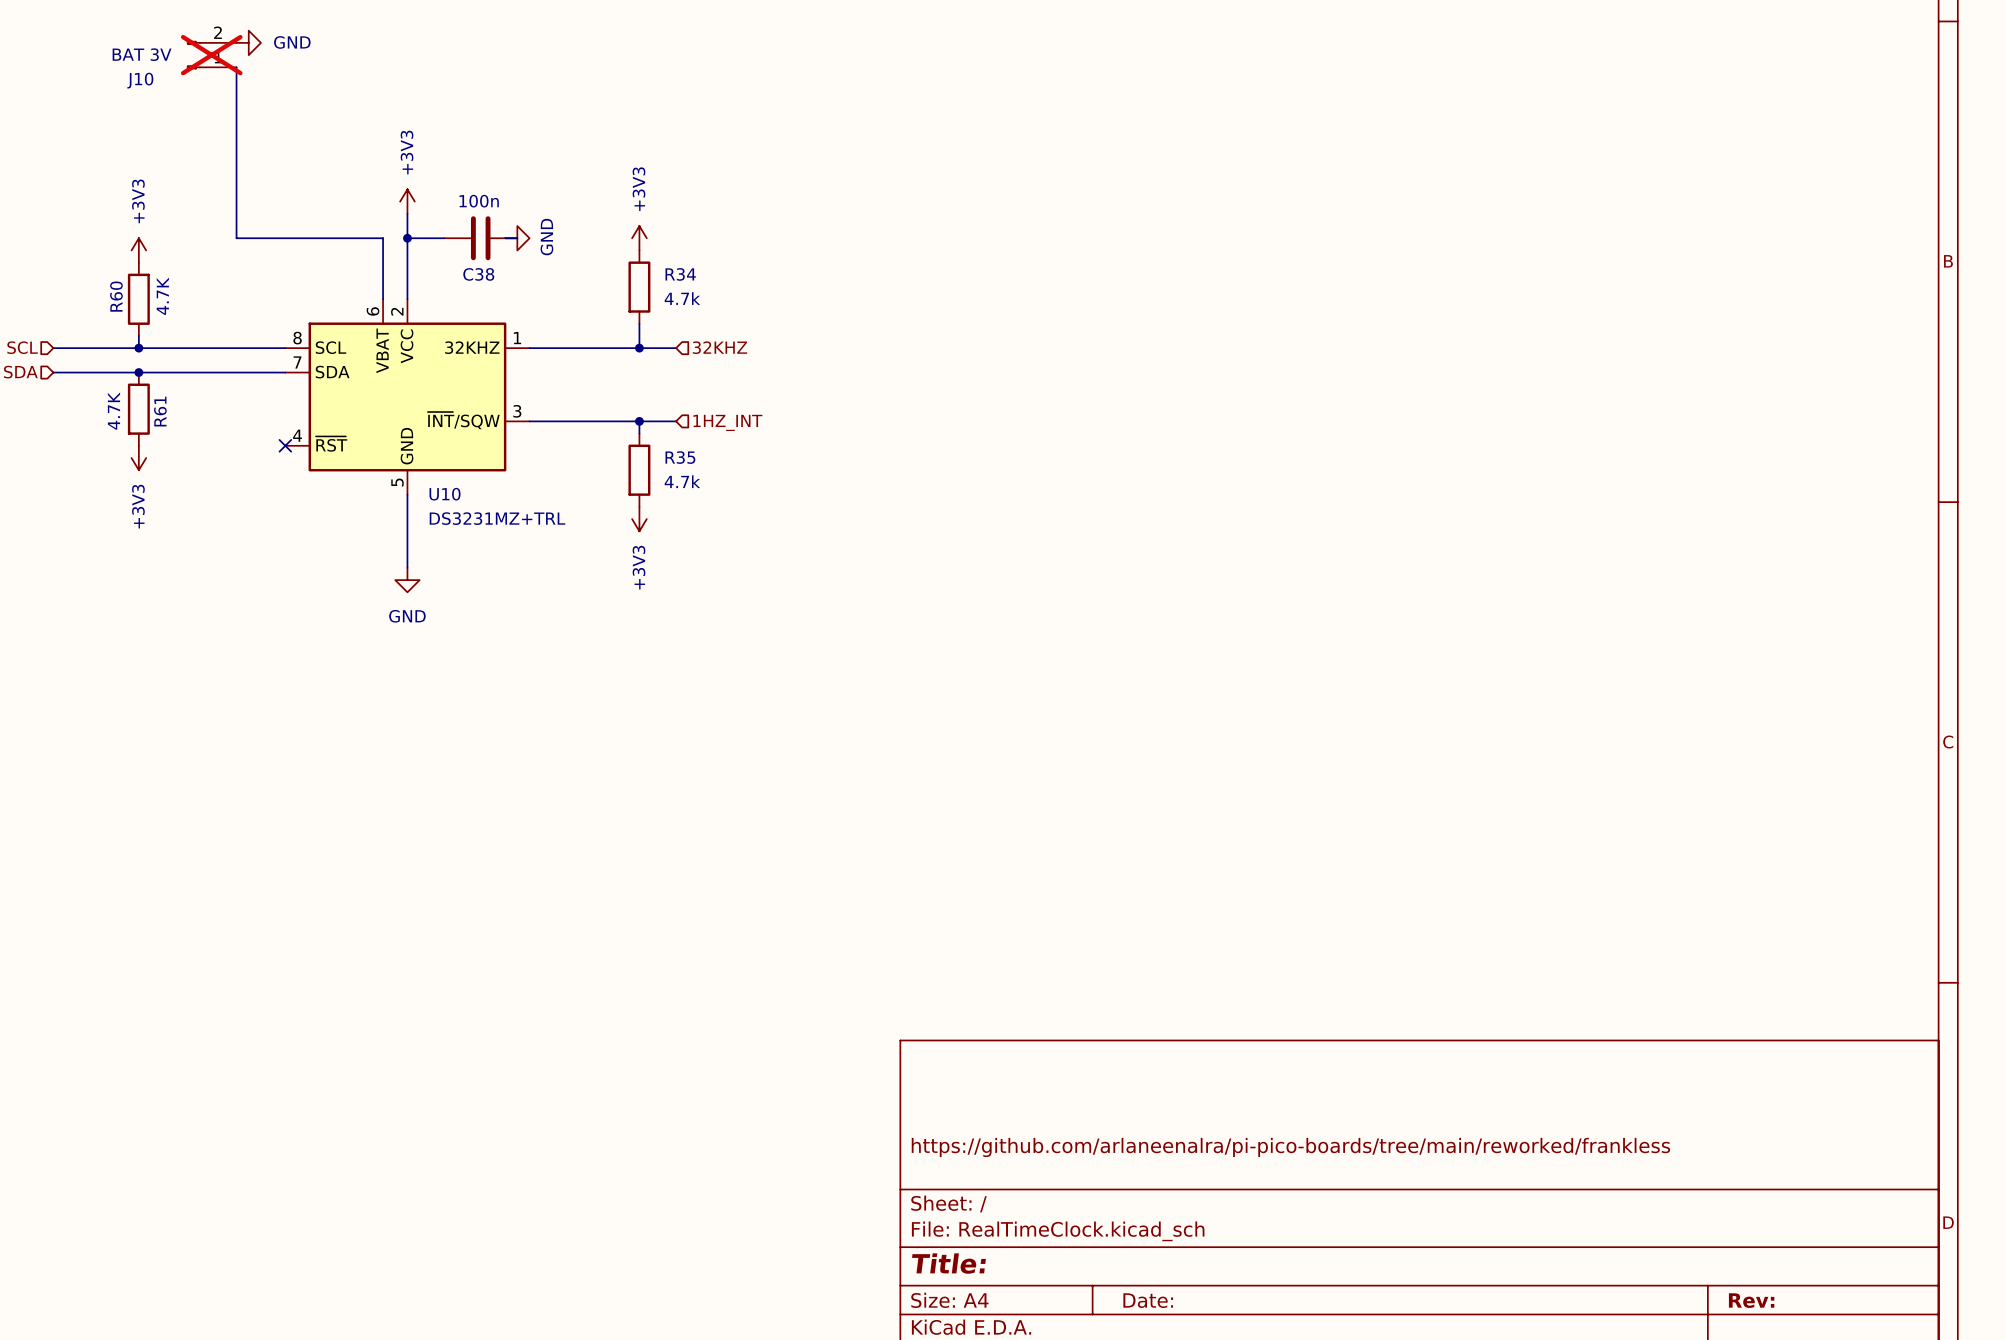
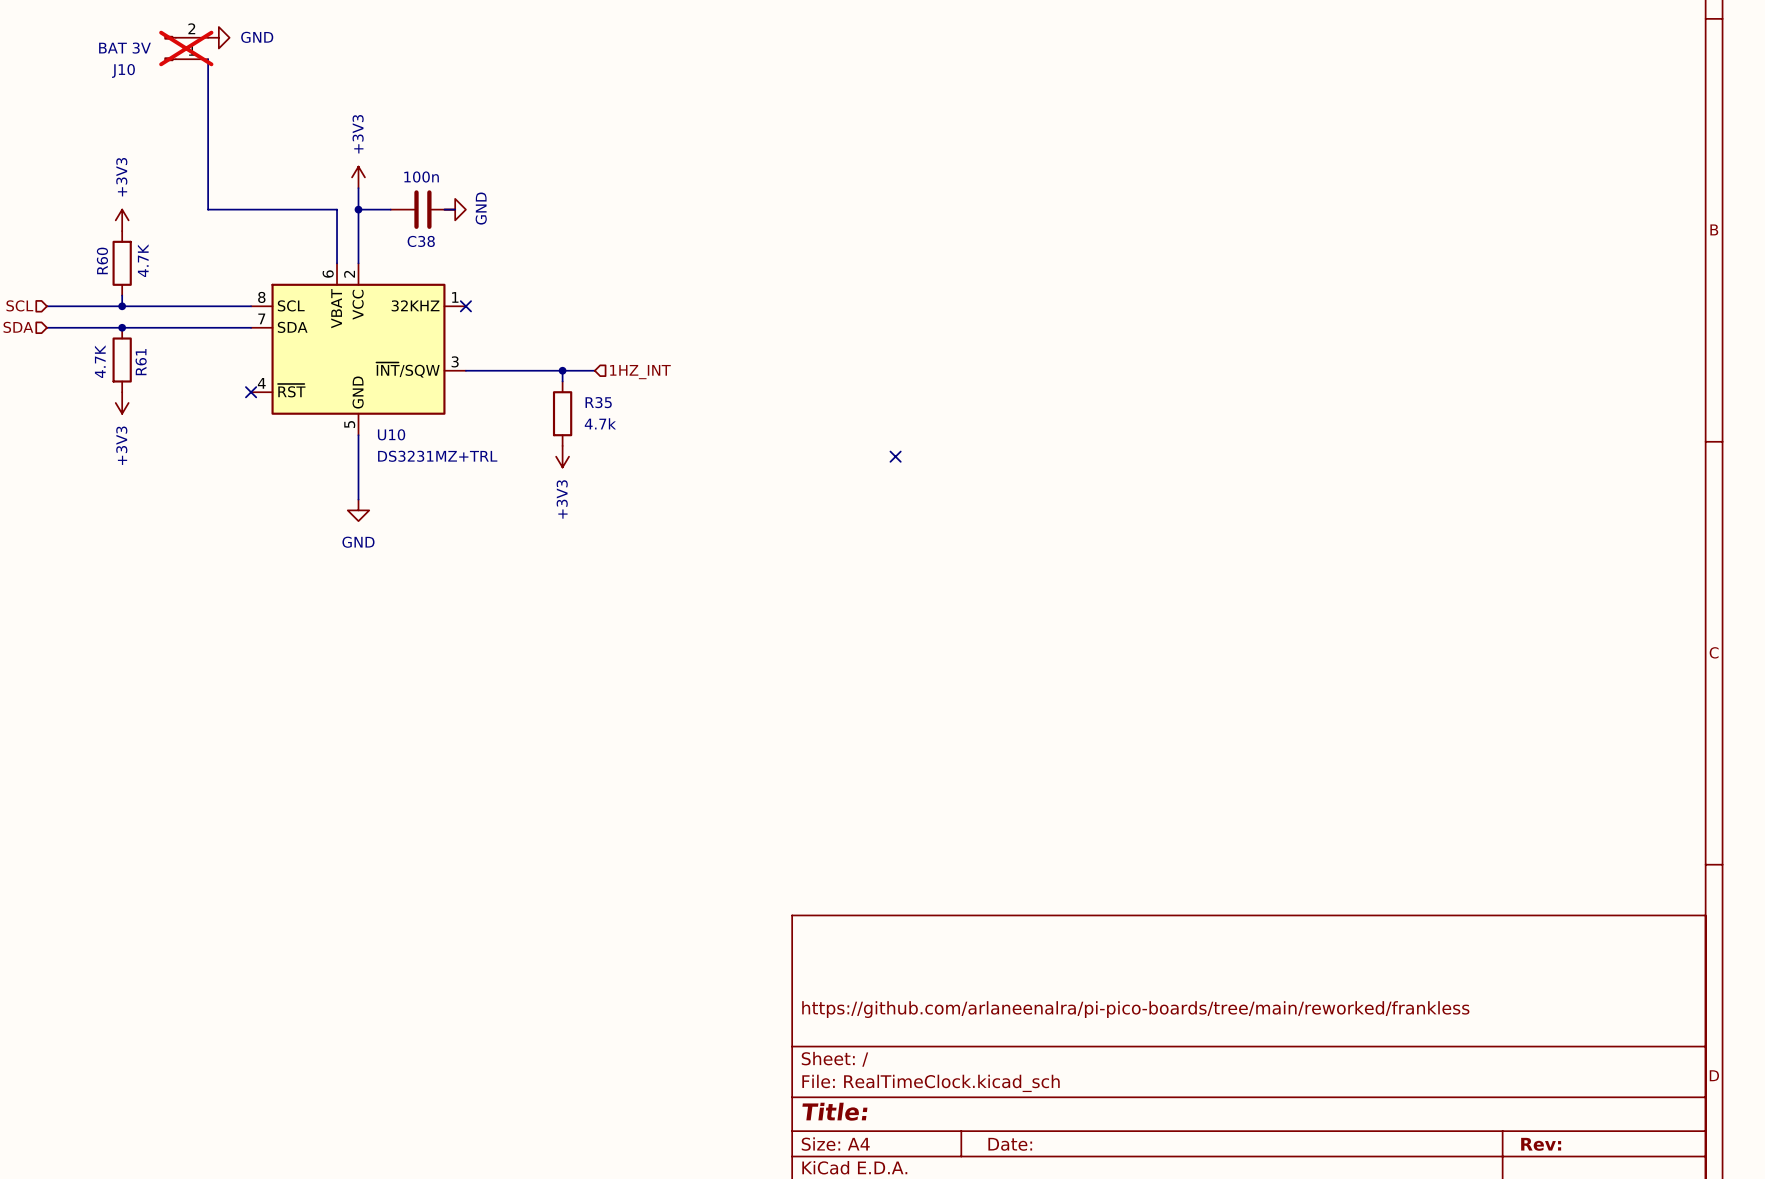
power symbol: +3V3 (639, 238) -> none
R34: 4.7k (639, 287) -> none
wire: (639, 323) (639, 348) -> none
hierarchical label: 32KHZ (720, 347) -> none
wire: (529, 348) (676, 348) -> none
no-connect mark: none -> (465, 306)
junction: (639, 348) -> none
no-connect mark: none -> (895, 456)

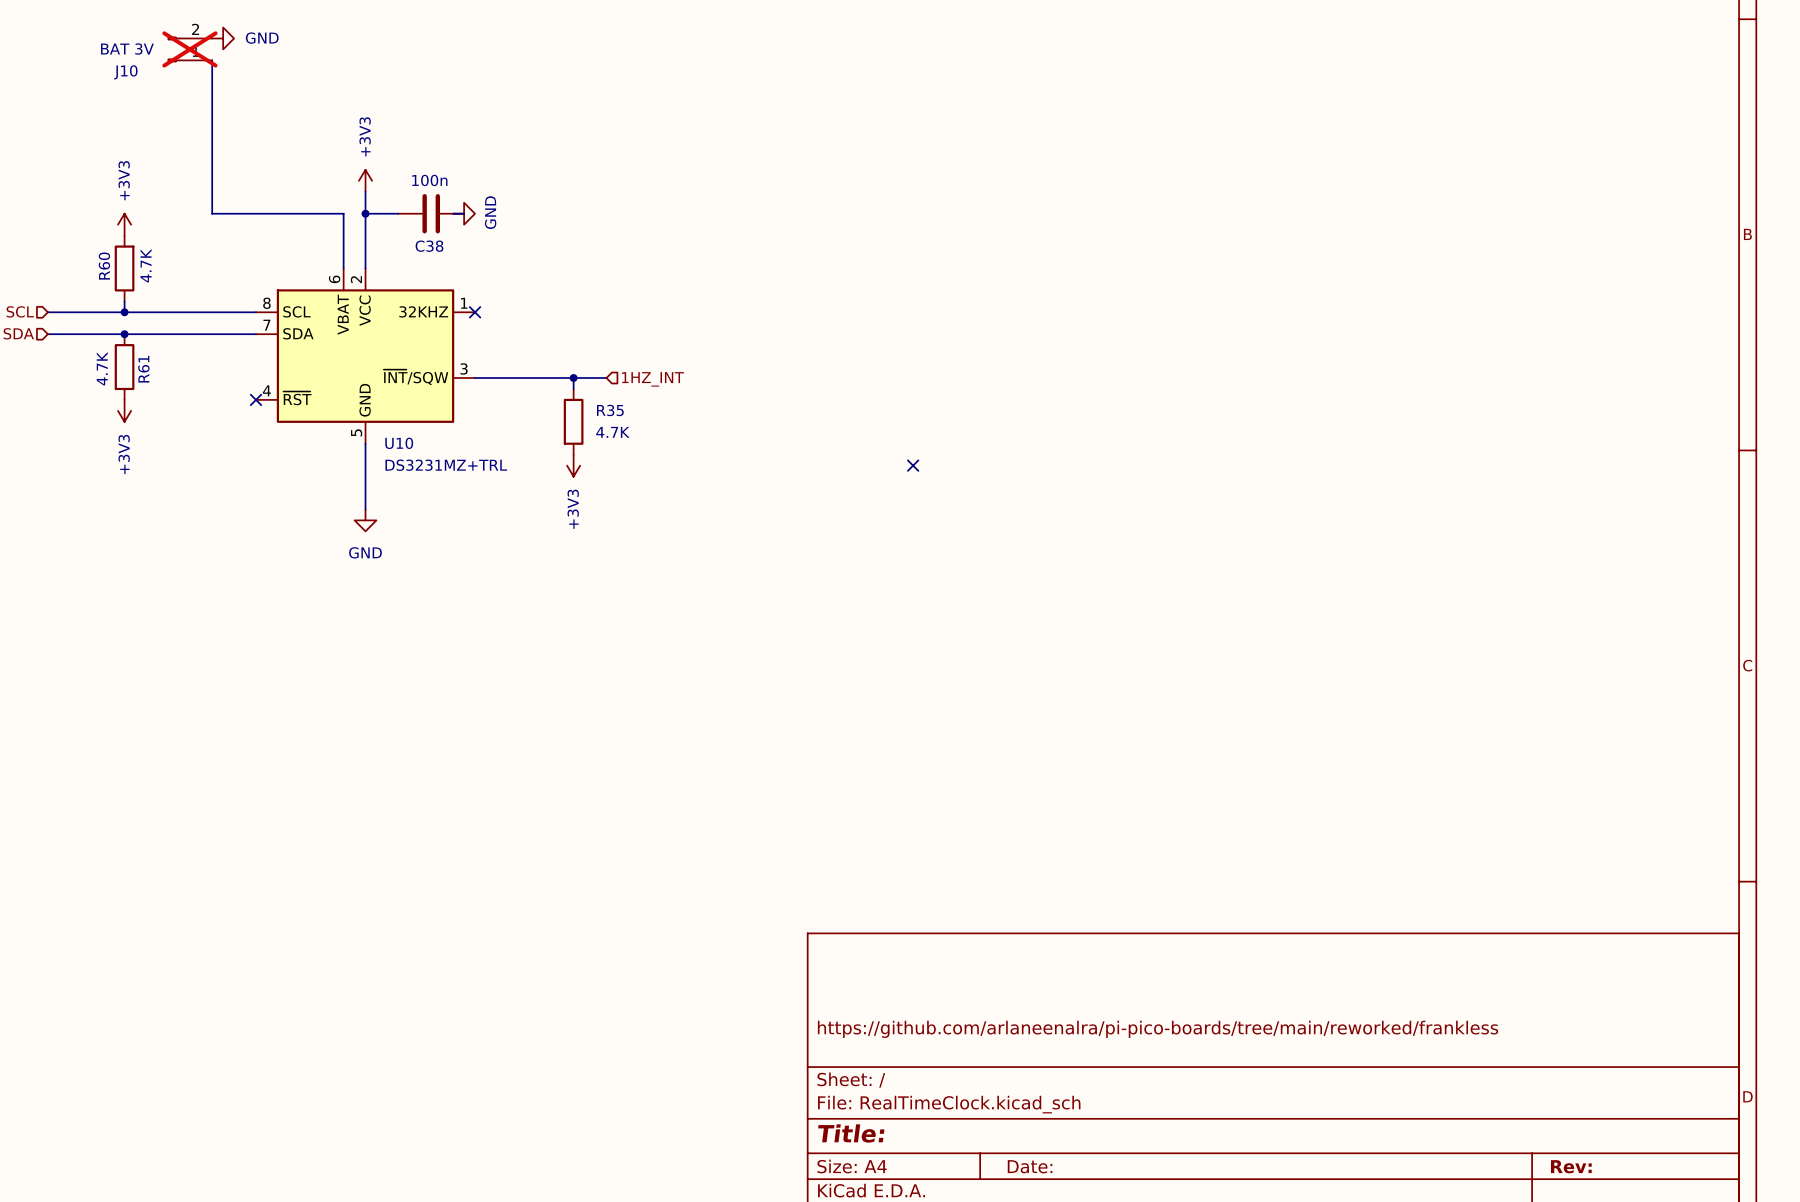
R35 value: 4.7k (600, 423) -> 4.7K (612, 432)

